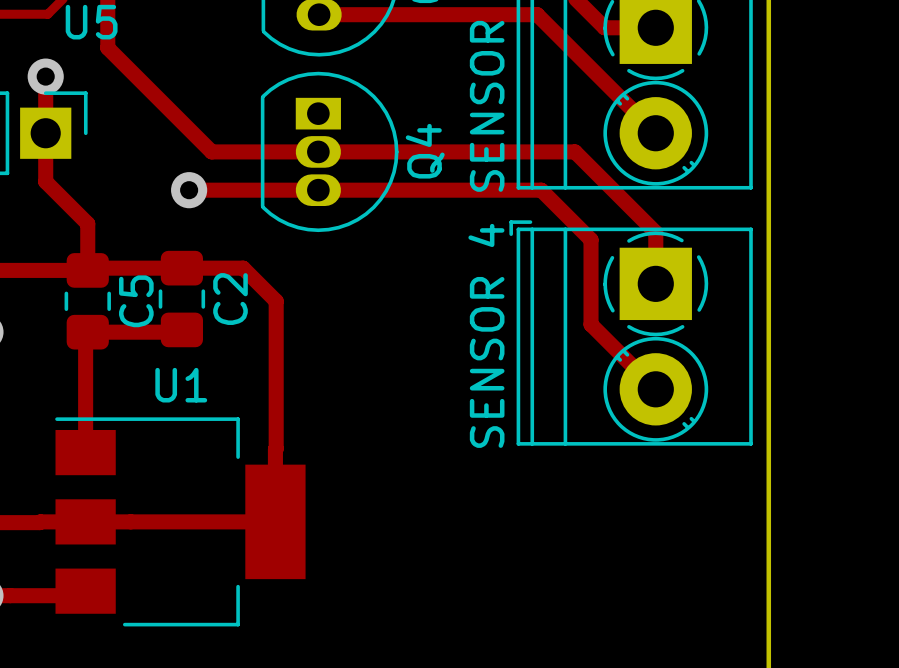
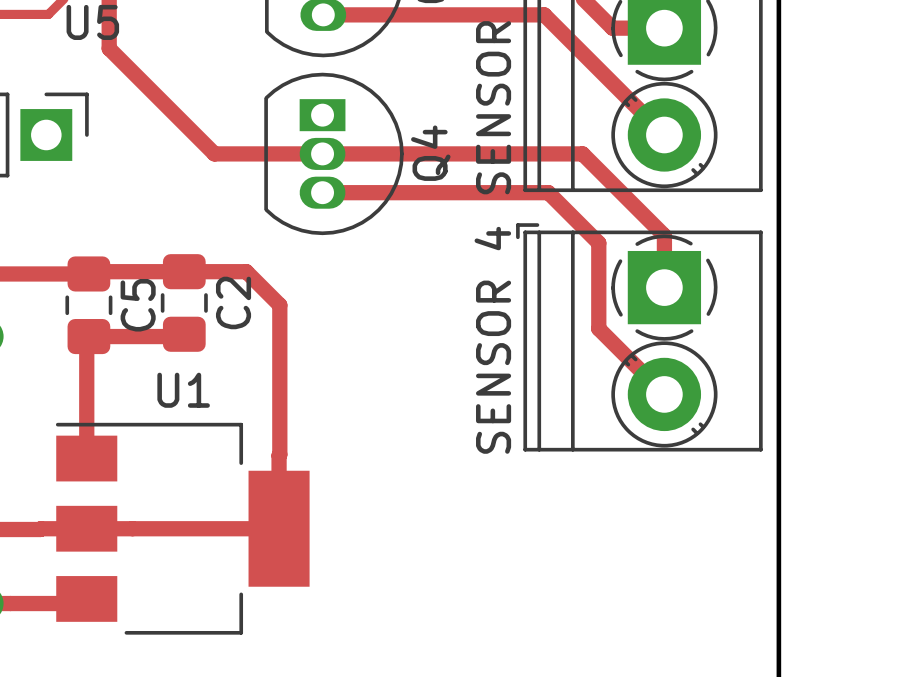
track: (45, 76) (45, 181) (87, 223) (87, 270) -> none
via: (45, 76) -> none
track: (189, 190) (318, 190) -> none
via: (189, 190) -> none

